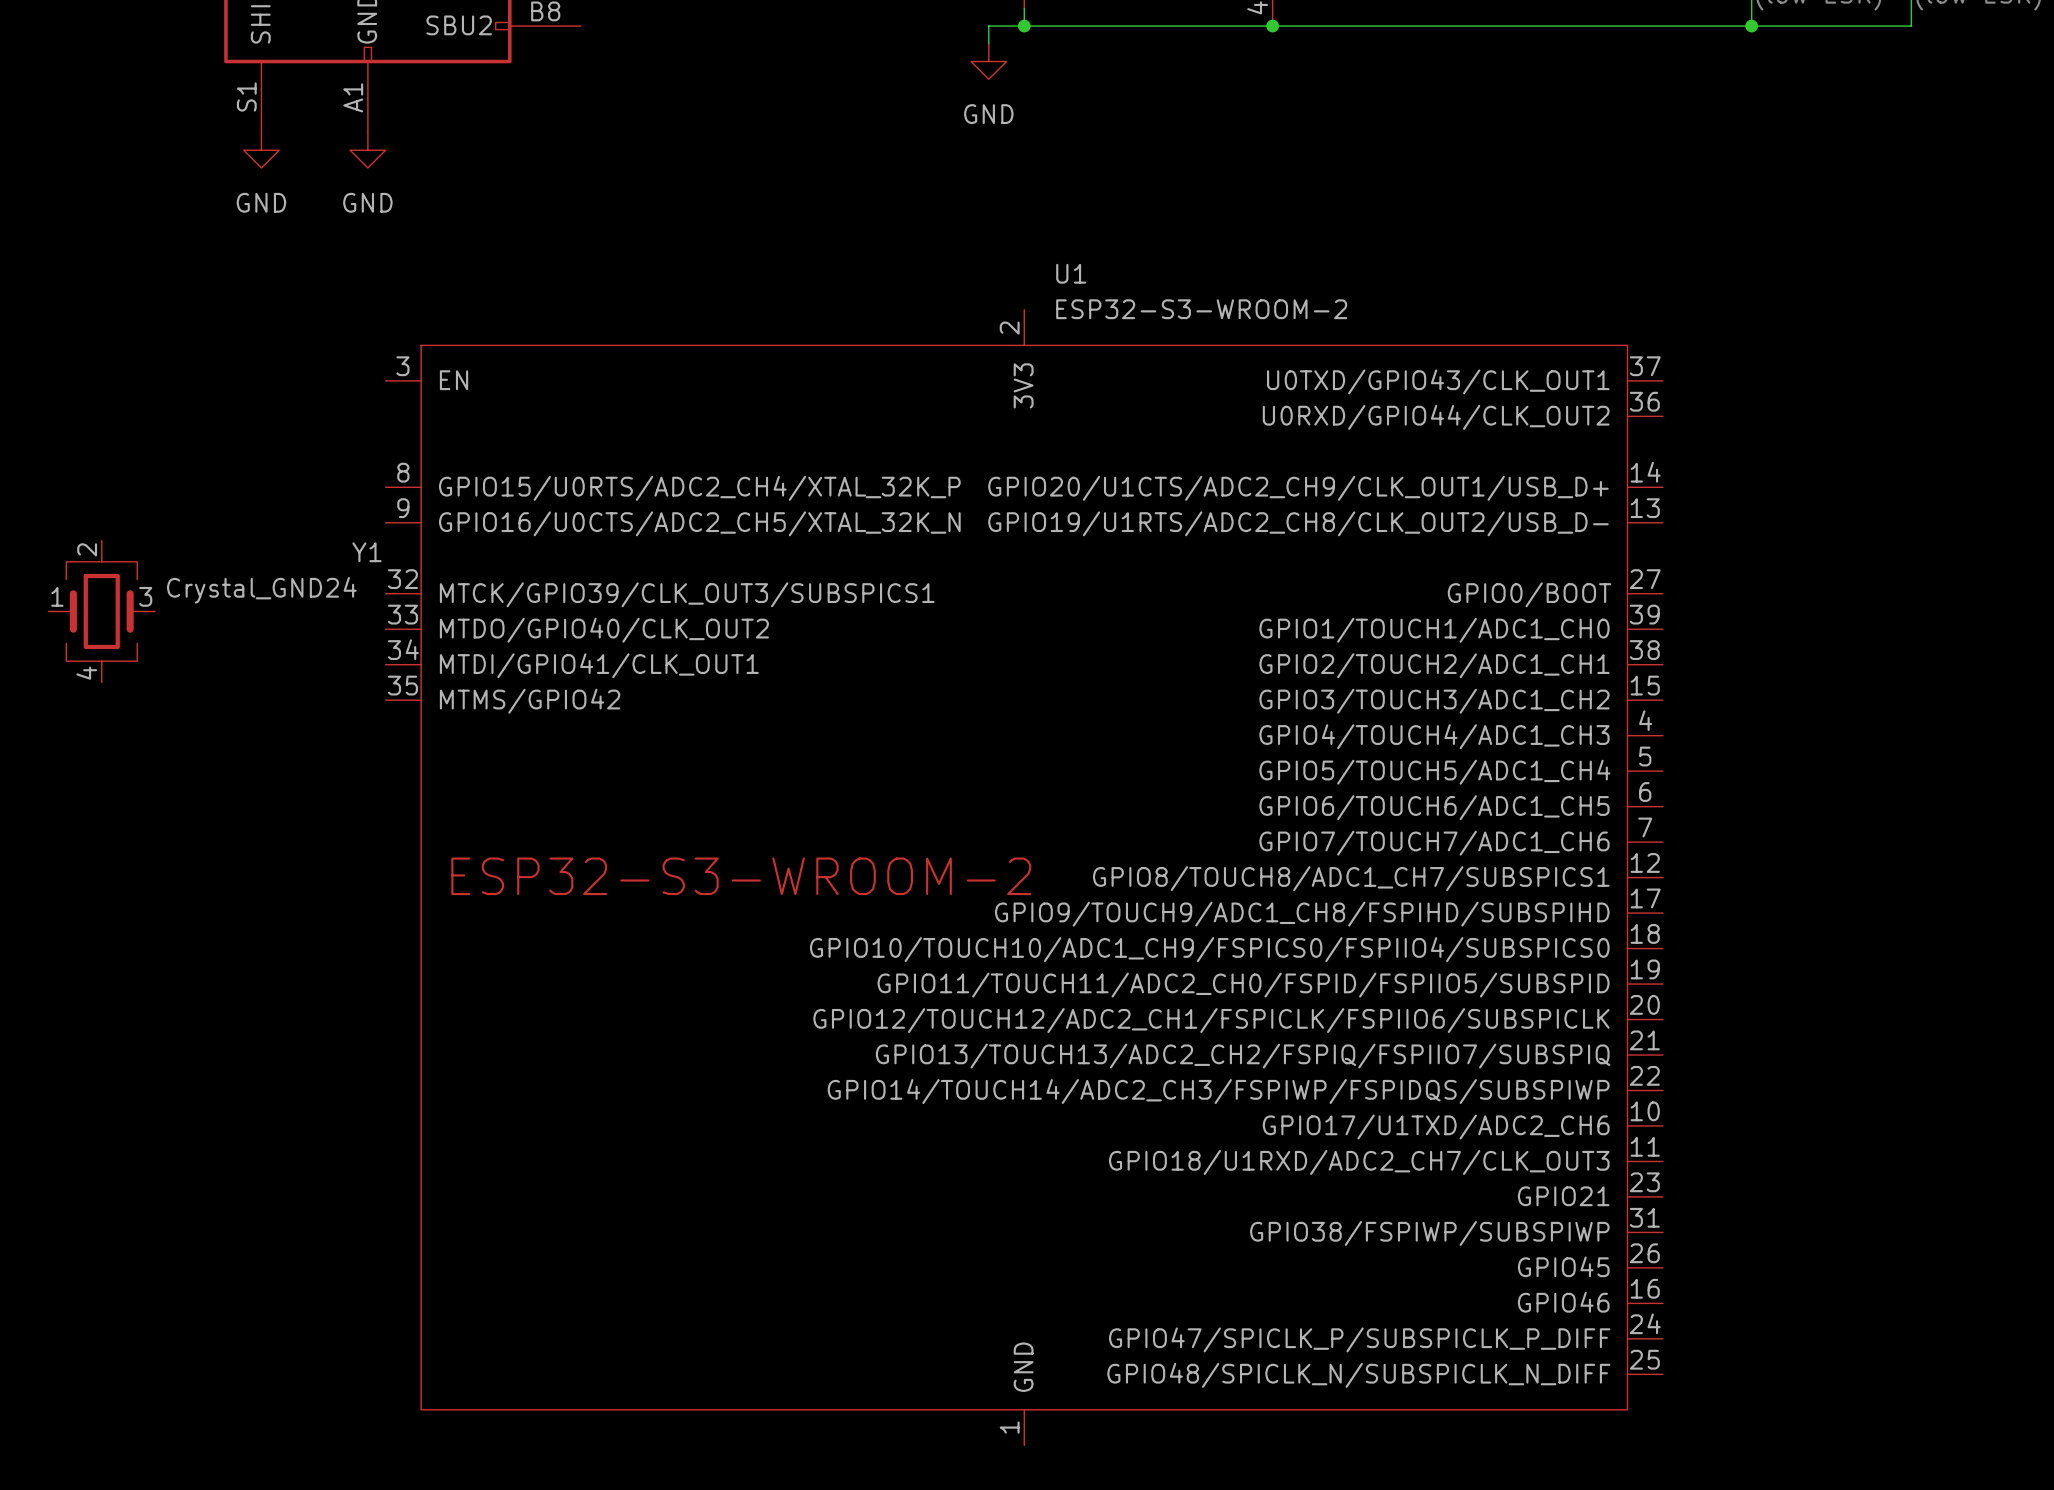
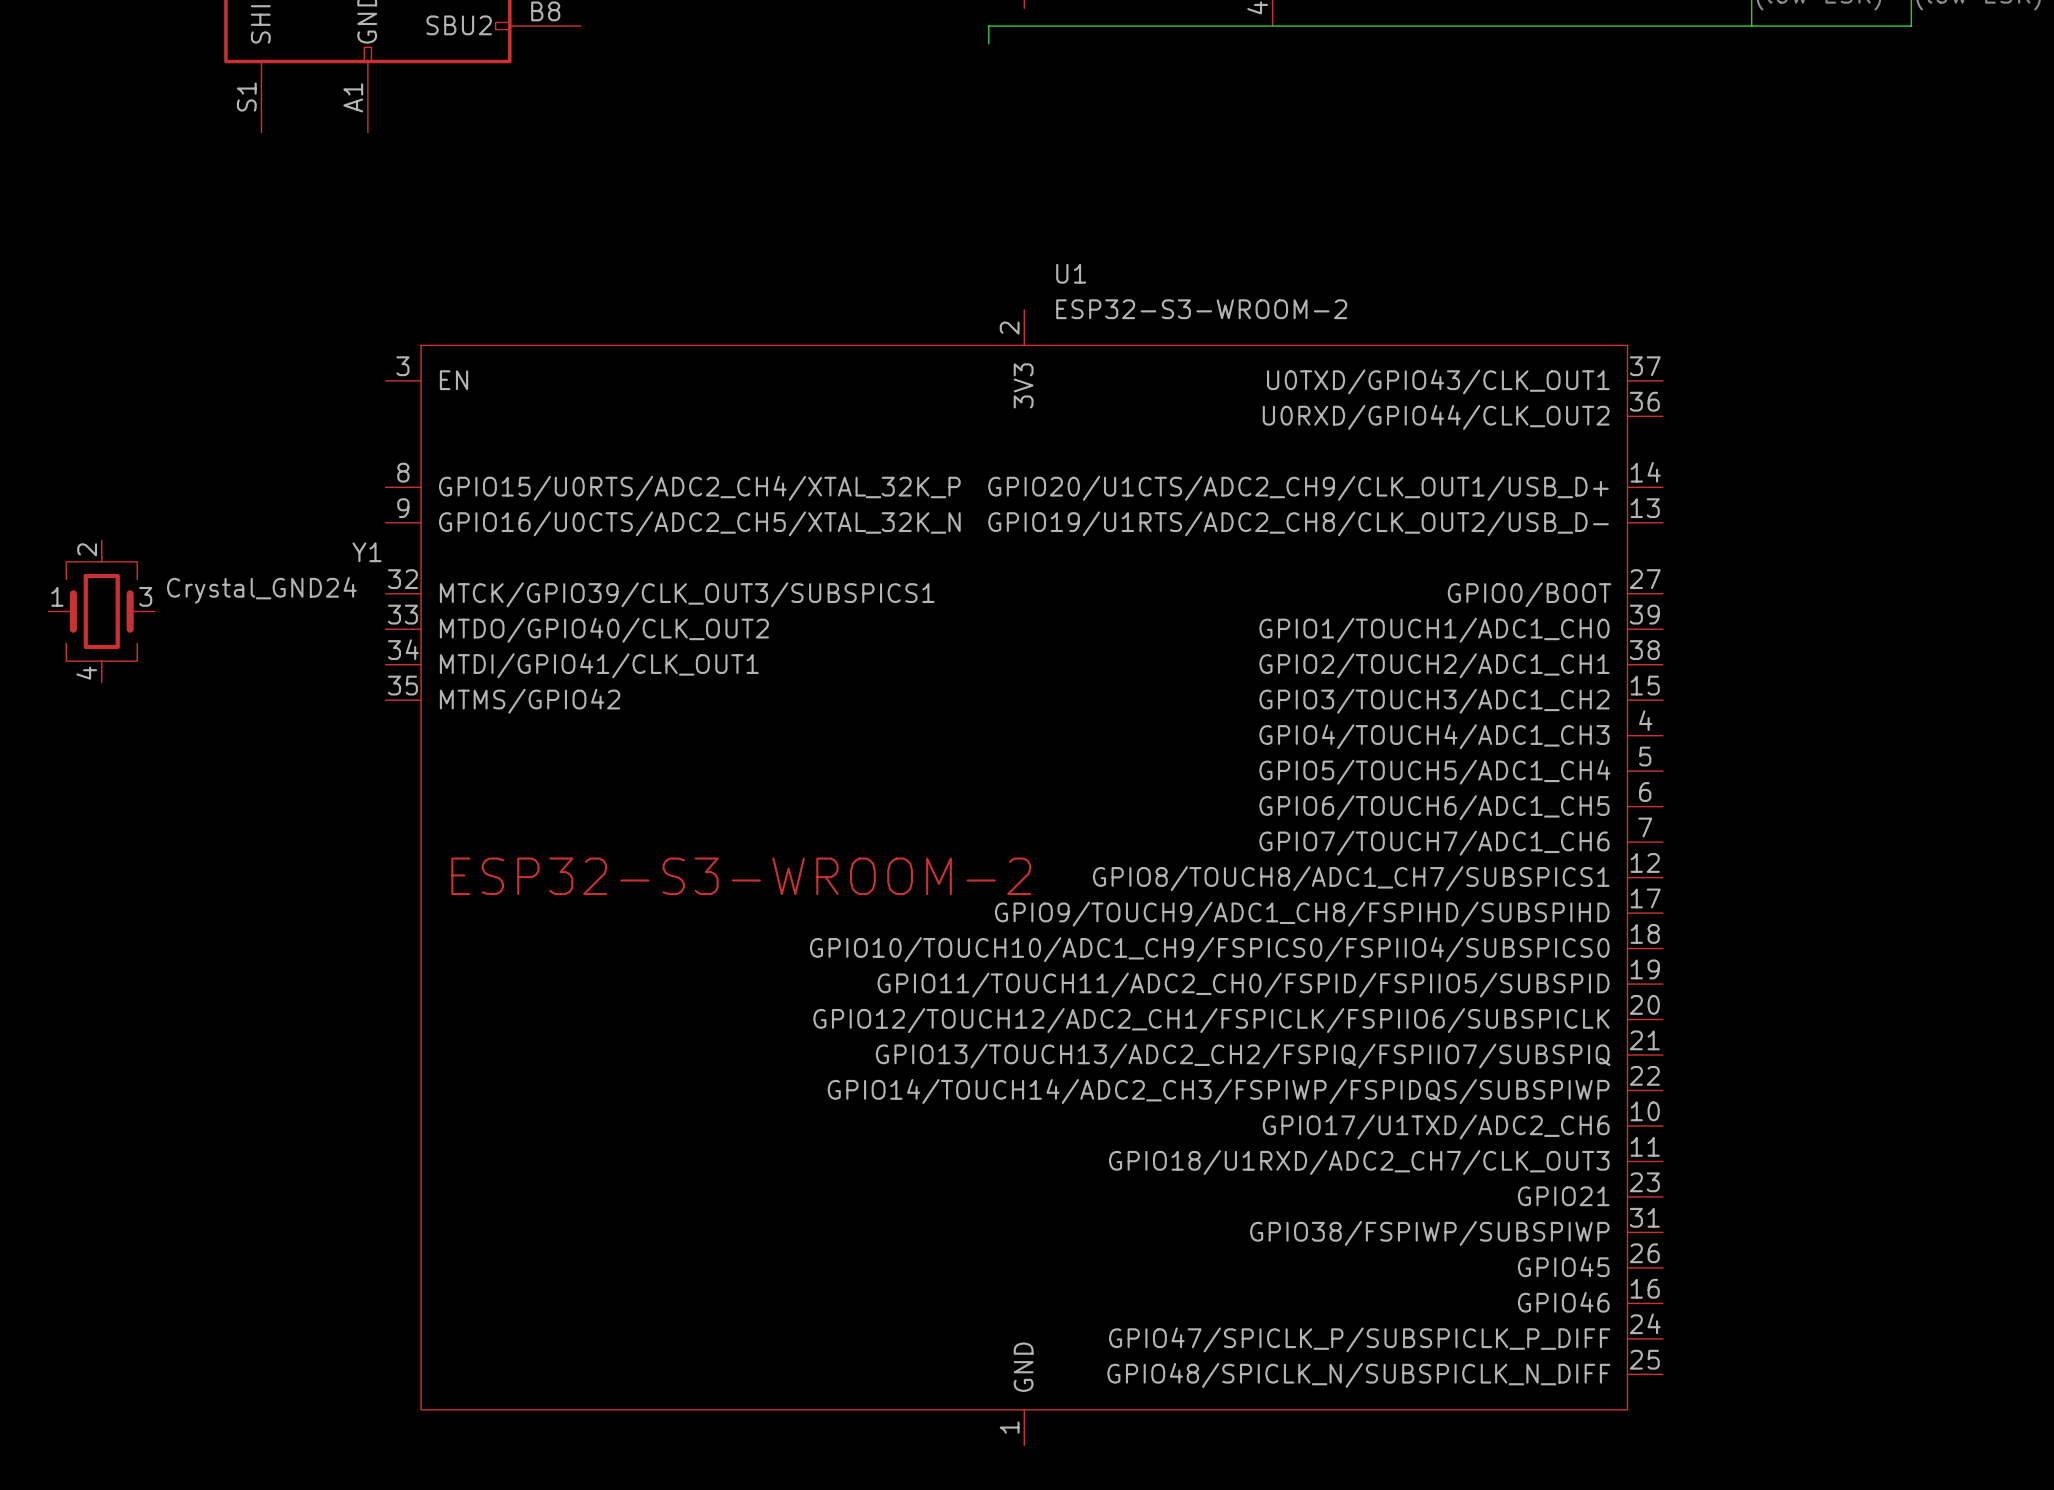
wire: (1024, 8) (1024, 26) -> none
junction: (1024, 26) -> none
junction: (1272, 26) -> none
junction: (1751, 26) -> none
power symbol: GND (988, 61) -> none
power symbol: GND (261, 150) -> none
power symbol: GND (367, 150) -> none

